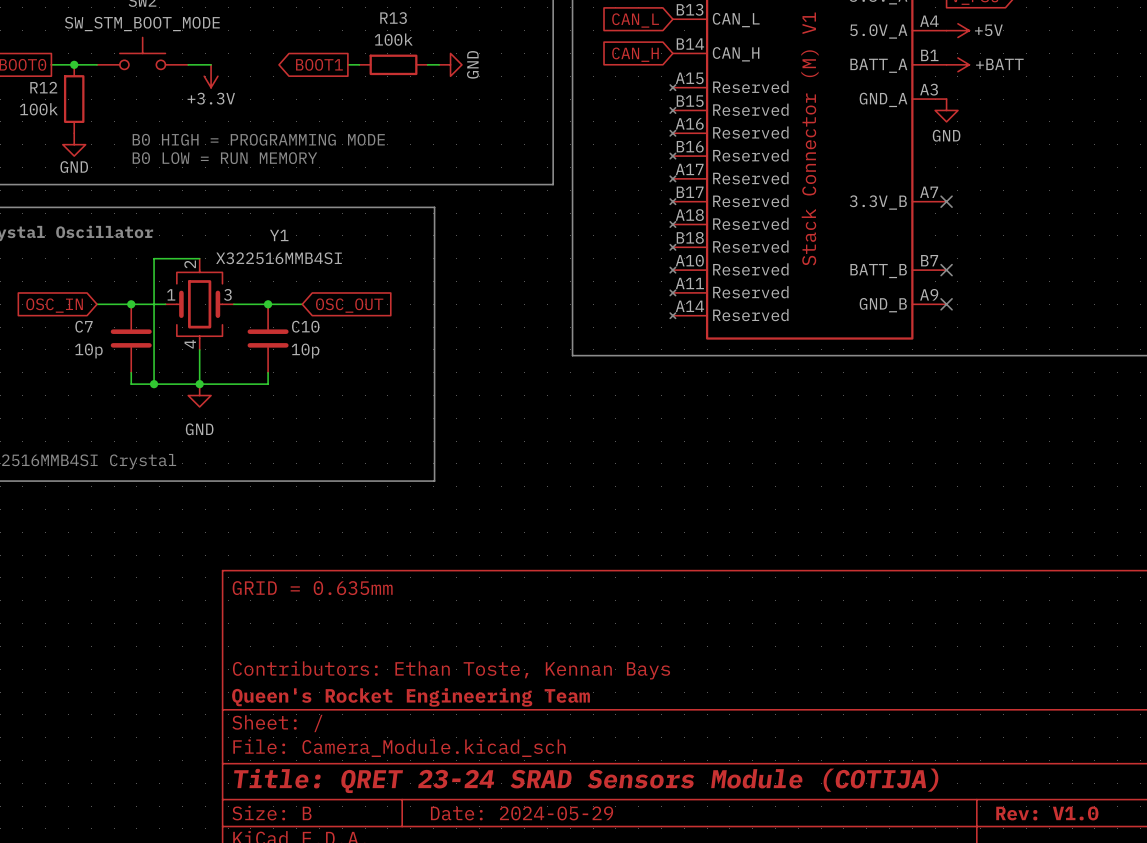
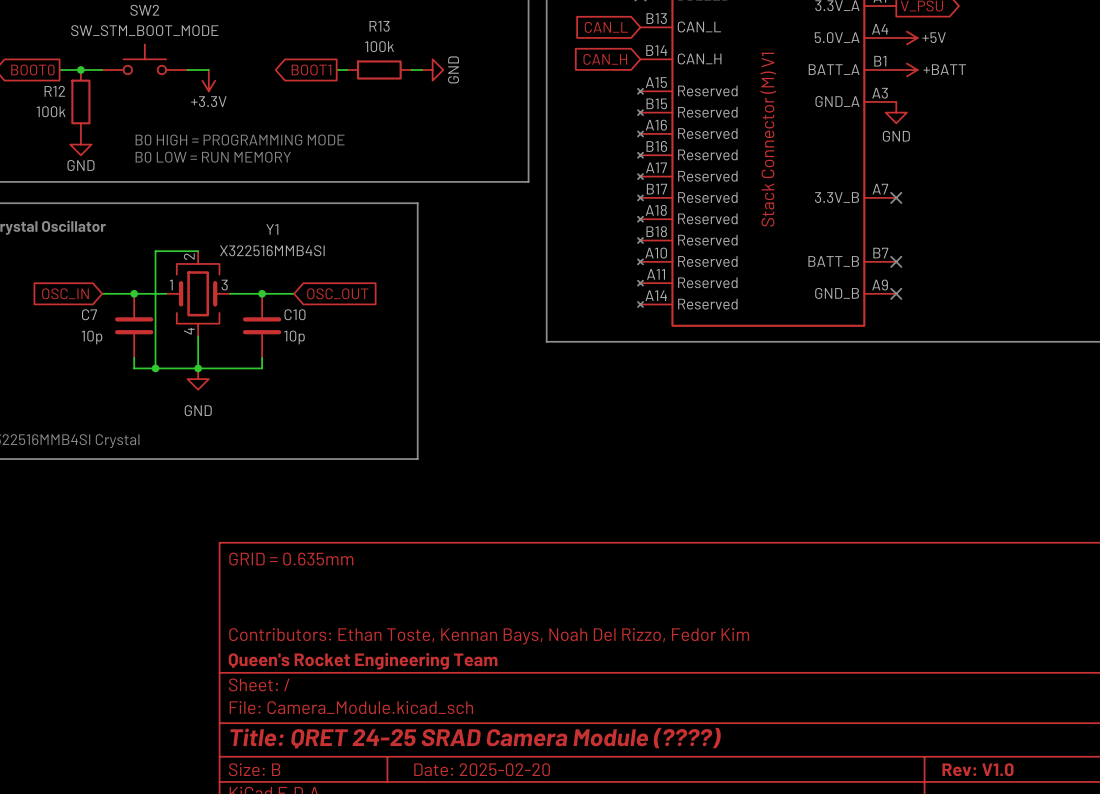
title block: Contributors: Ethan Toste, Kennan Bays (451, 670) -> Contributors: Ethan Toste, Kennan Bays, Noah Del Rizzo, Fedor Kim (489, 636)
title block: Title: QRET 23-24 SRAD Sensors Module (COTIJA) (586, 780) -> Title: QRET 24-25 SRAD Camera Module (????) (475, 738)
title block: Date: 2024-05-29 (522, 813) -> Date: 2025-02-20 (482, 769)

